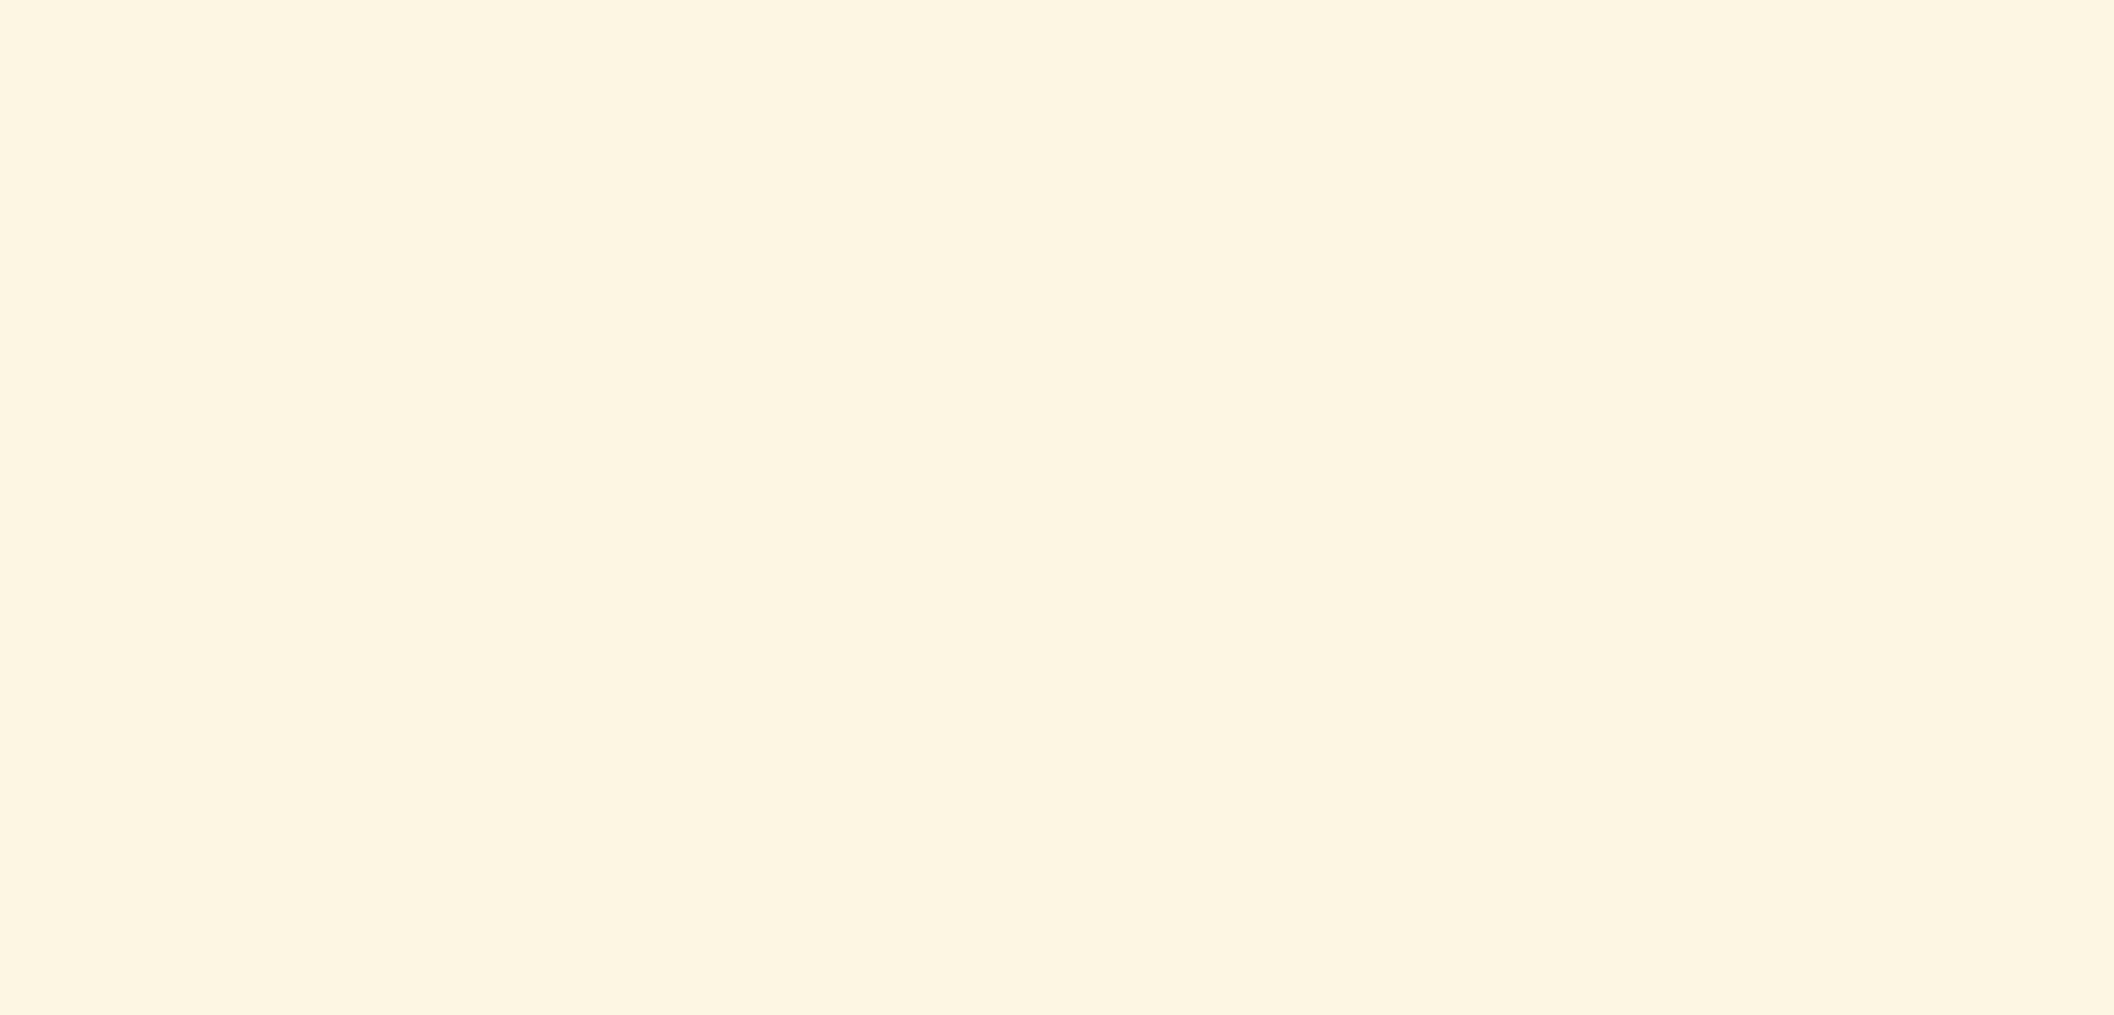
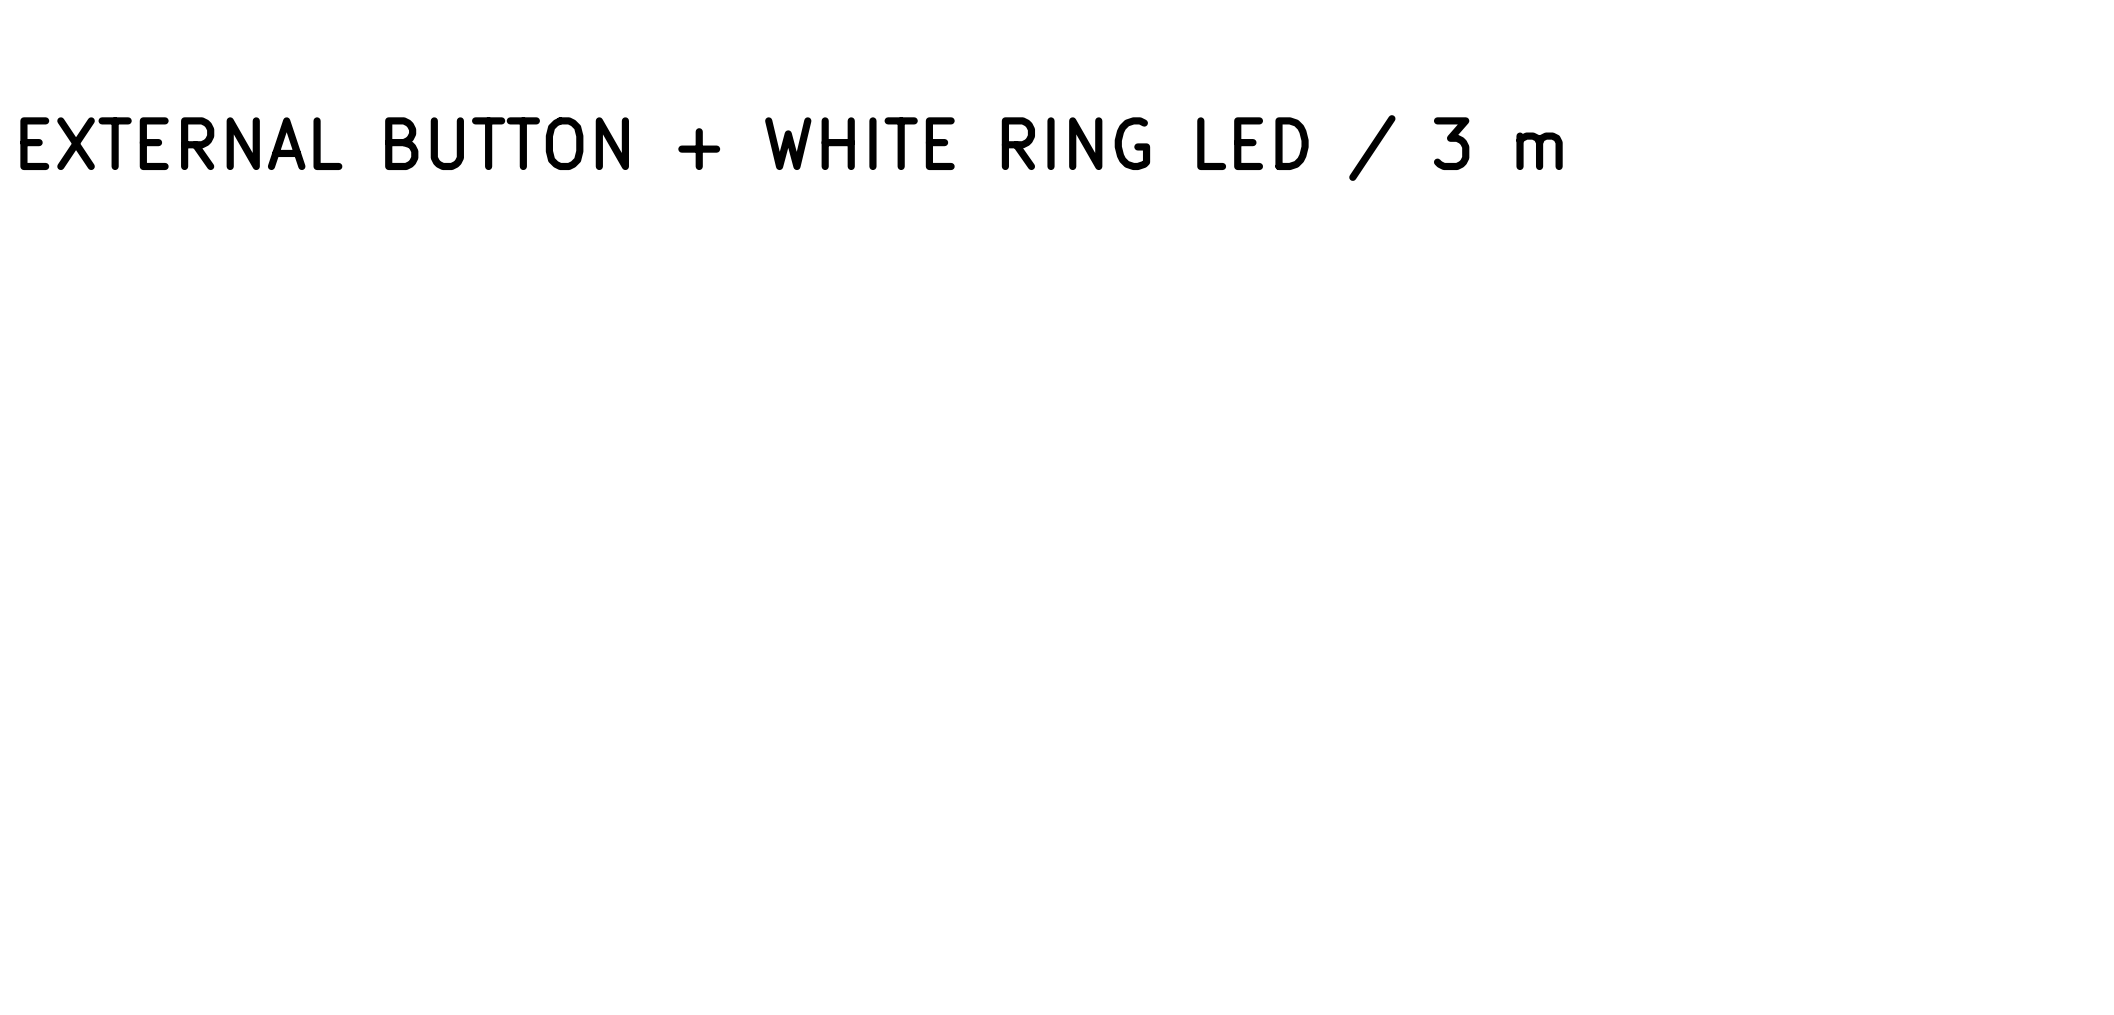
text: none -> EXTERNAL BUTTON + WHITE RING LED / 3 m (791, 148)

